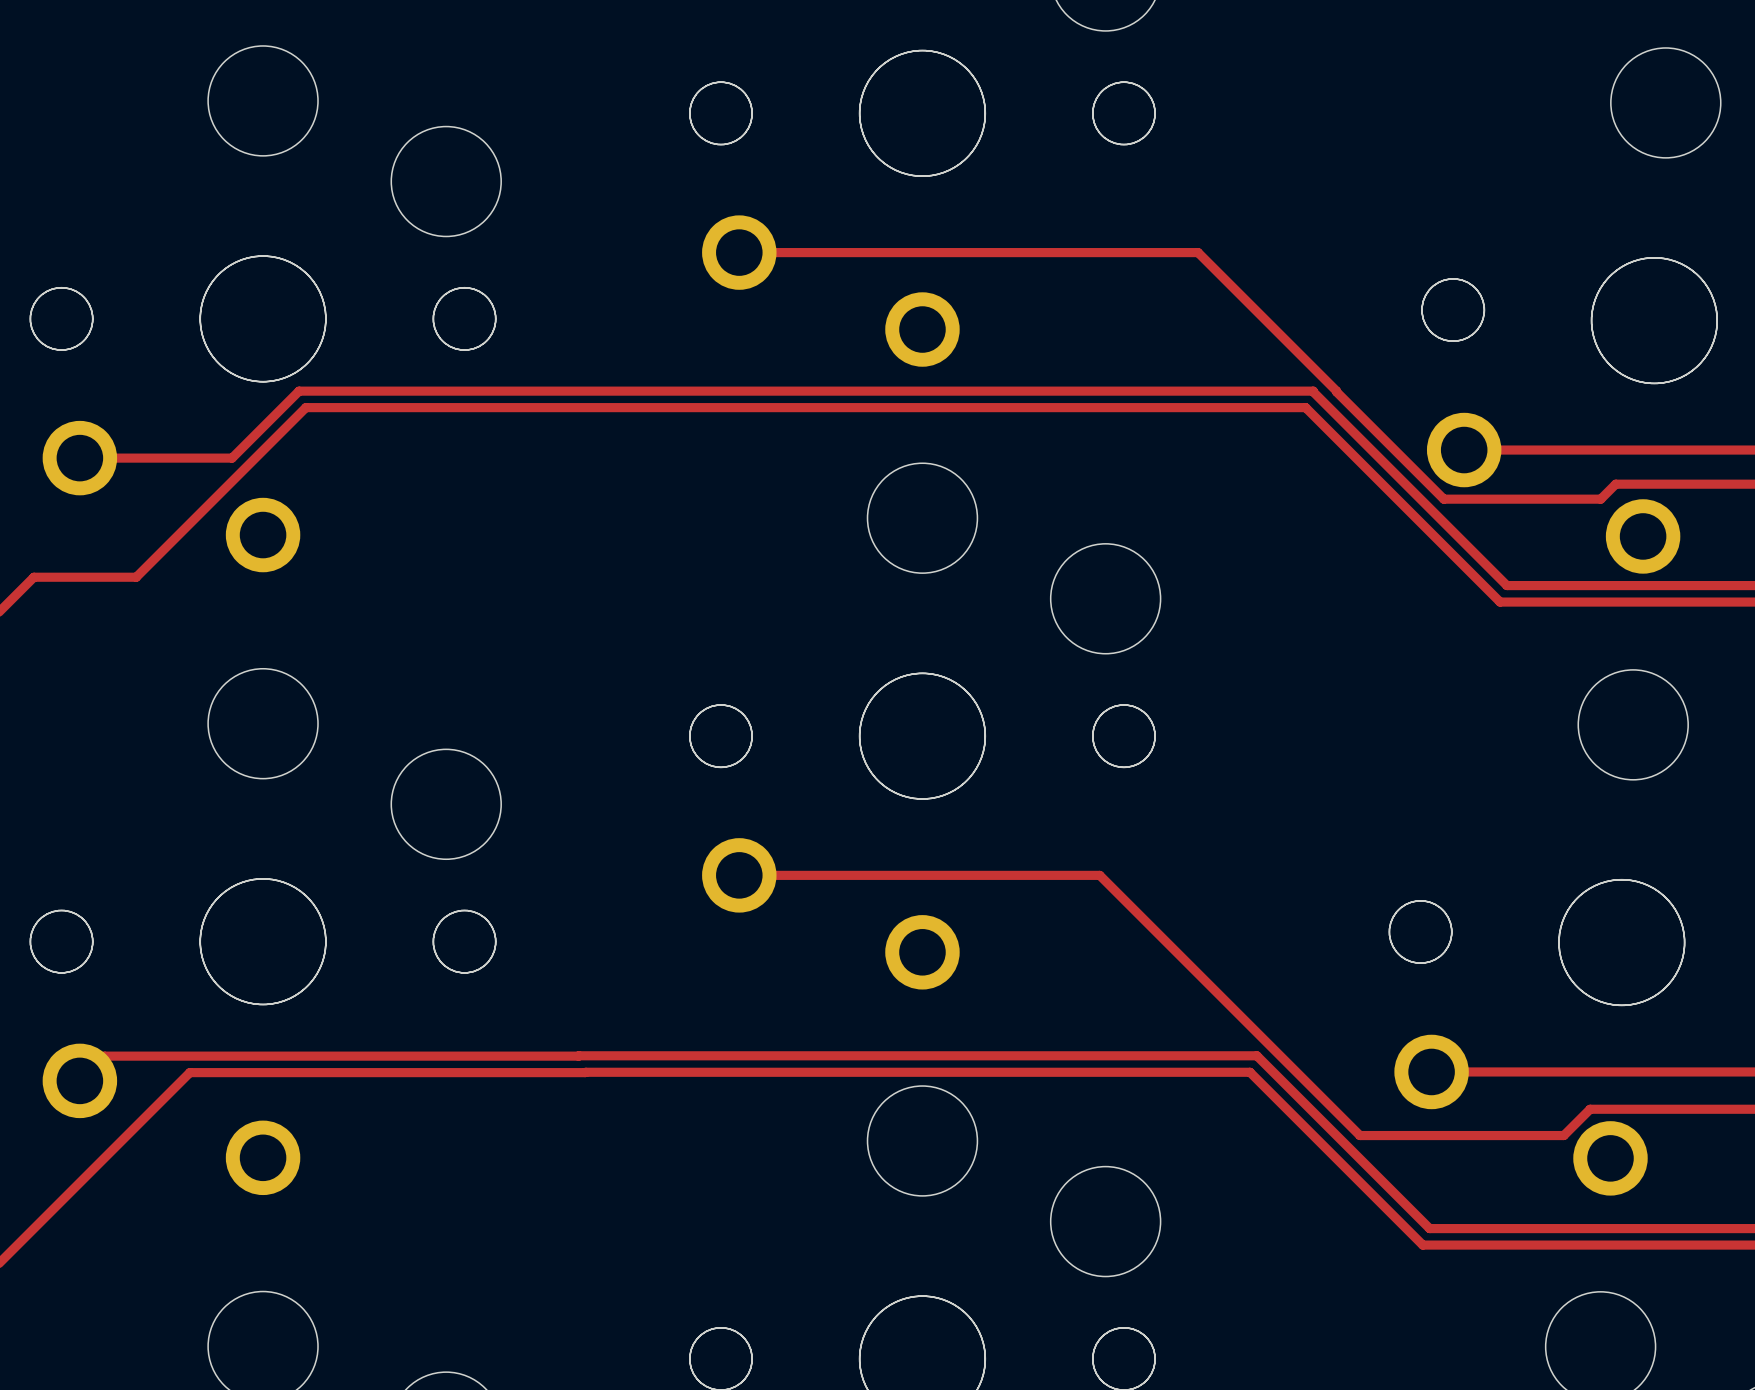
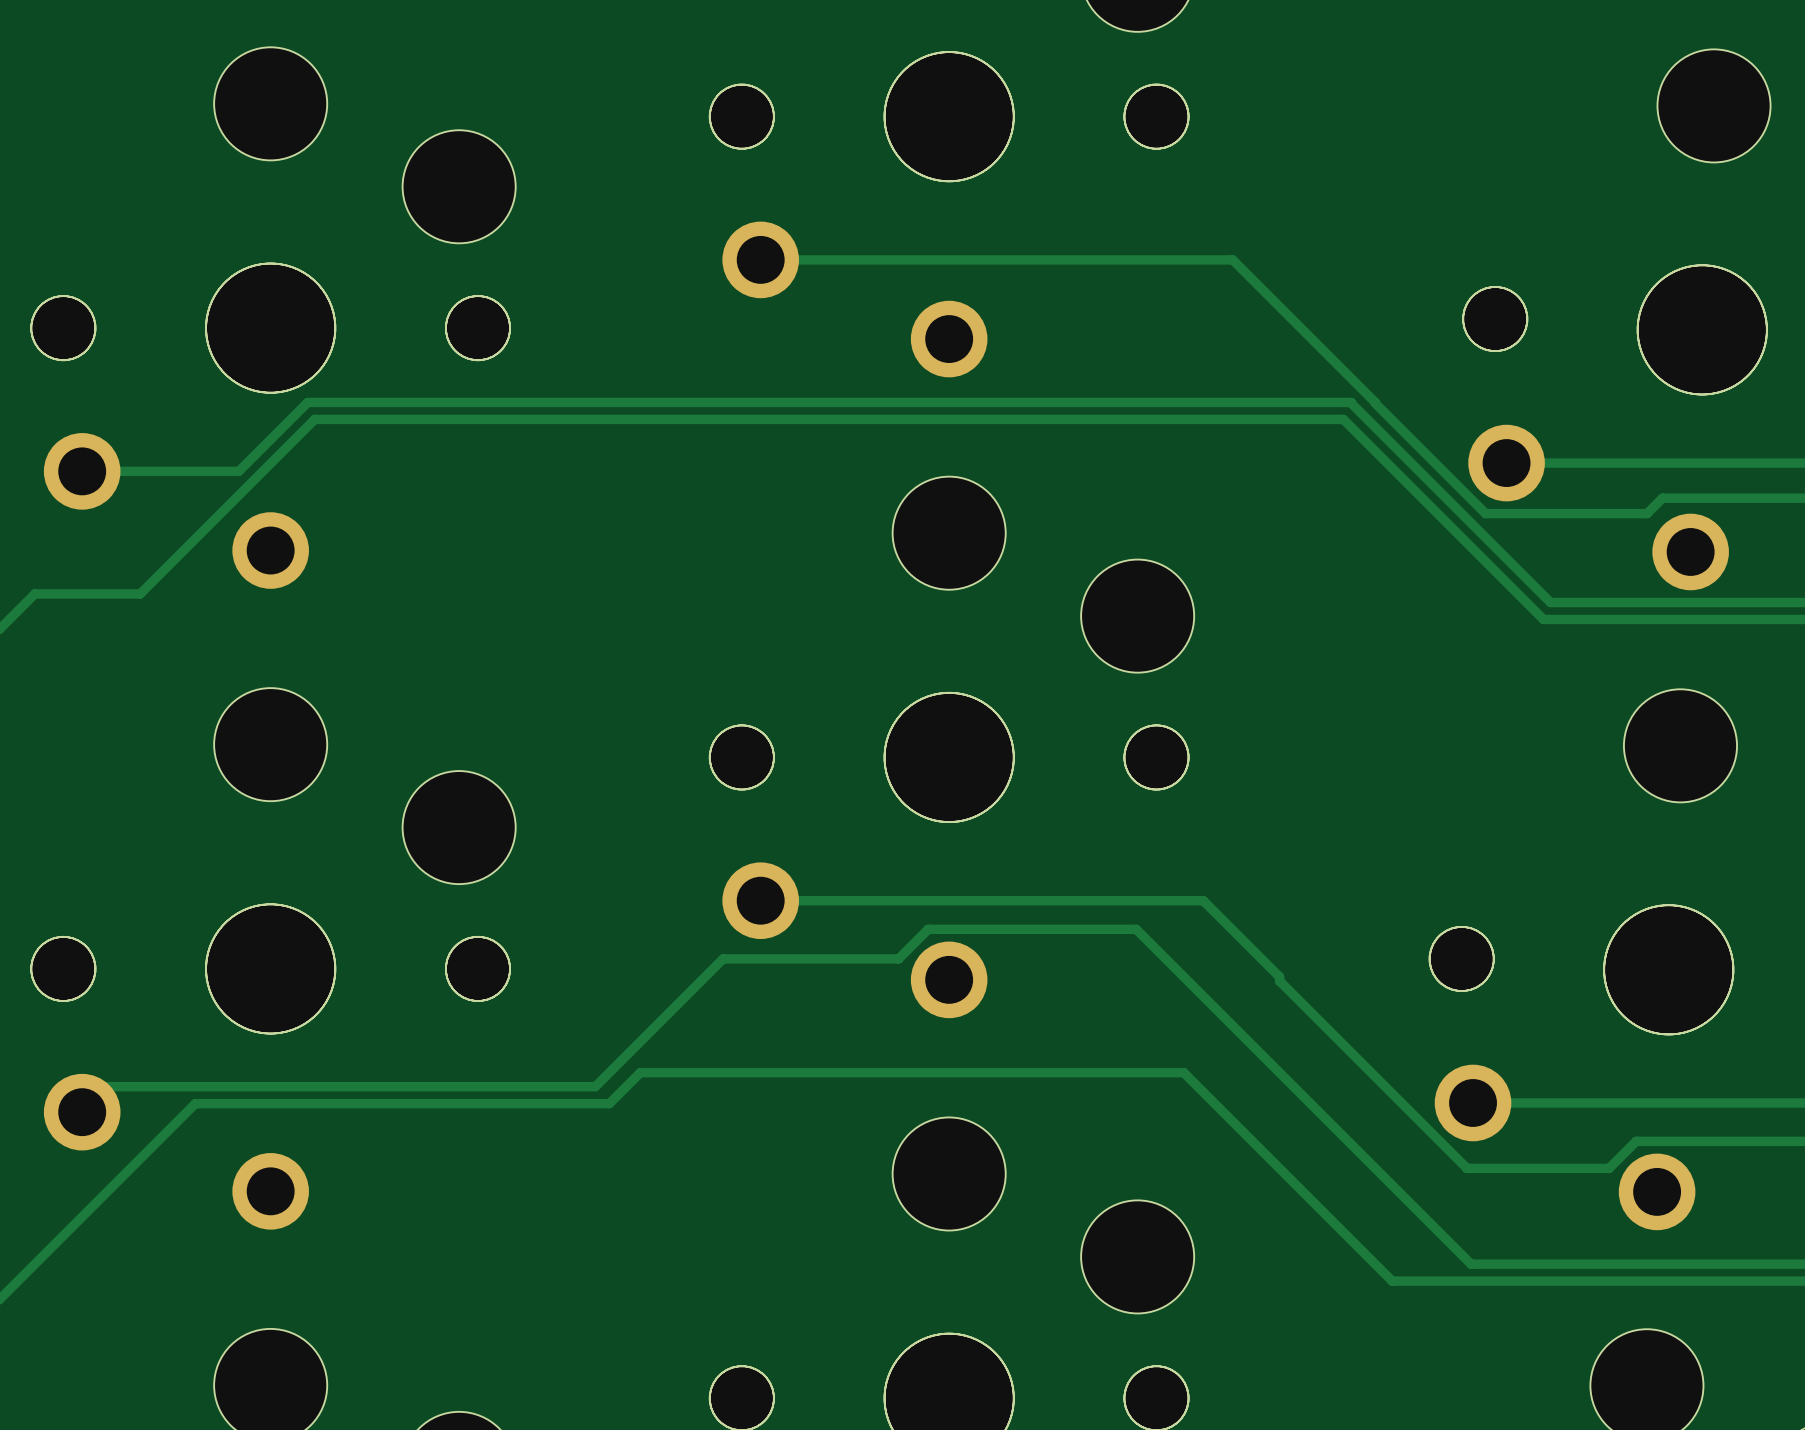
track: (1099, 875) (1359, 1135) (1425, 1135) -> (1131, 900) (1203, 900) (1279, 976) (1279, 981) (1466, 1168)
track: (578, 1055) (1256, 1055) -> (595, 1086) (723, 958) (898, 958) (928, 929) (1136, 929) (1293, 1086)
track: (585, 1072) (1250, 1072) (1422, 1245) -> (602, 1103) (609, 1103) (640, 1072) (1183, 1072) (1392, 1281) (1464, 1281)

